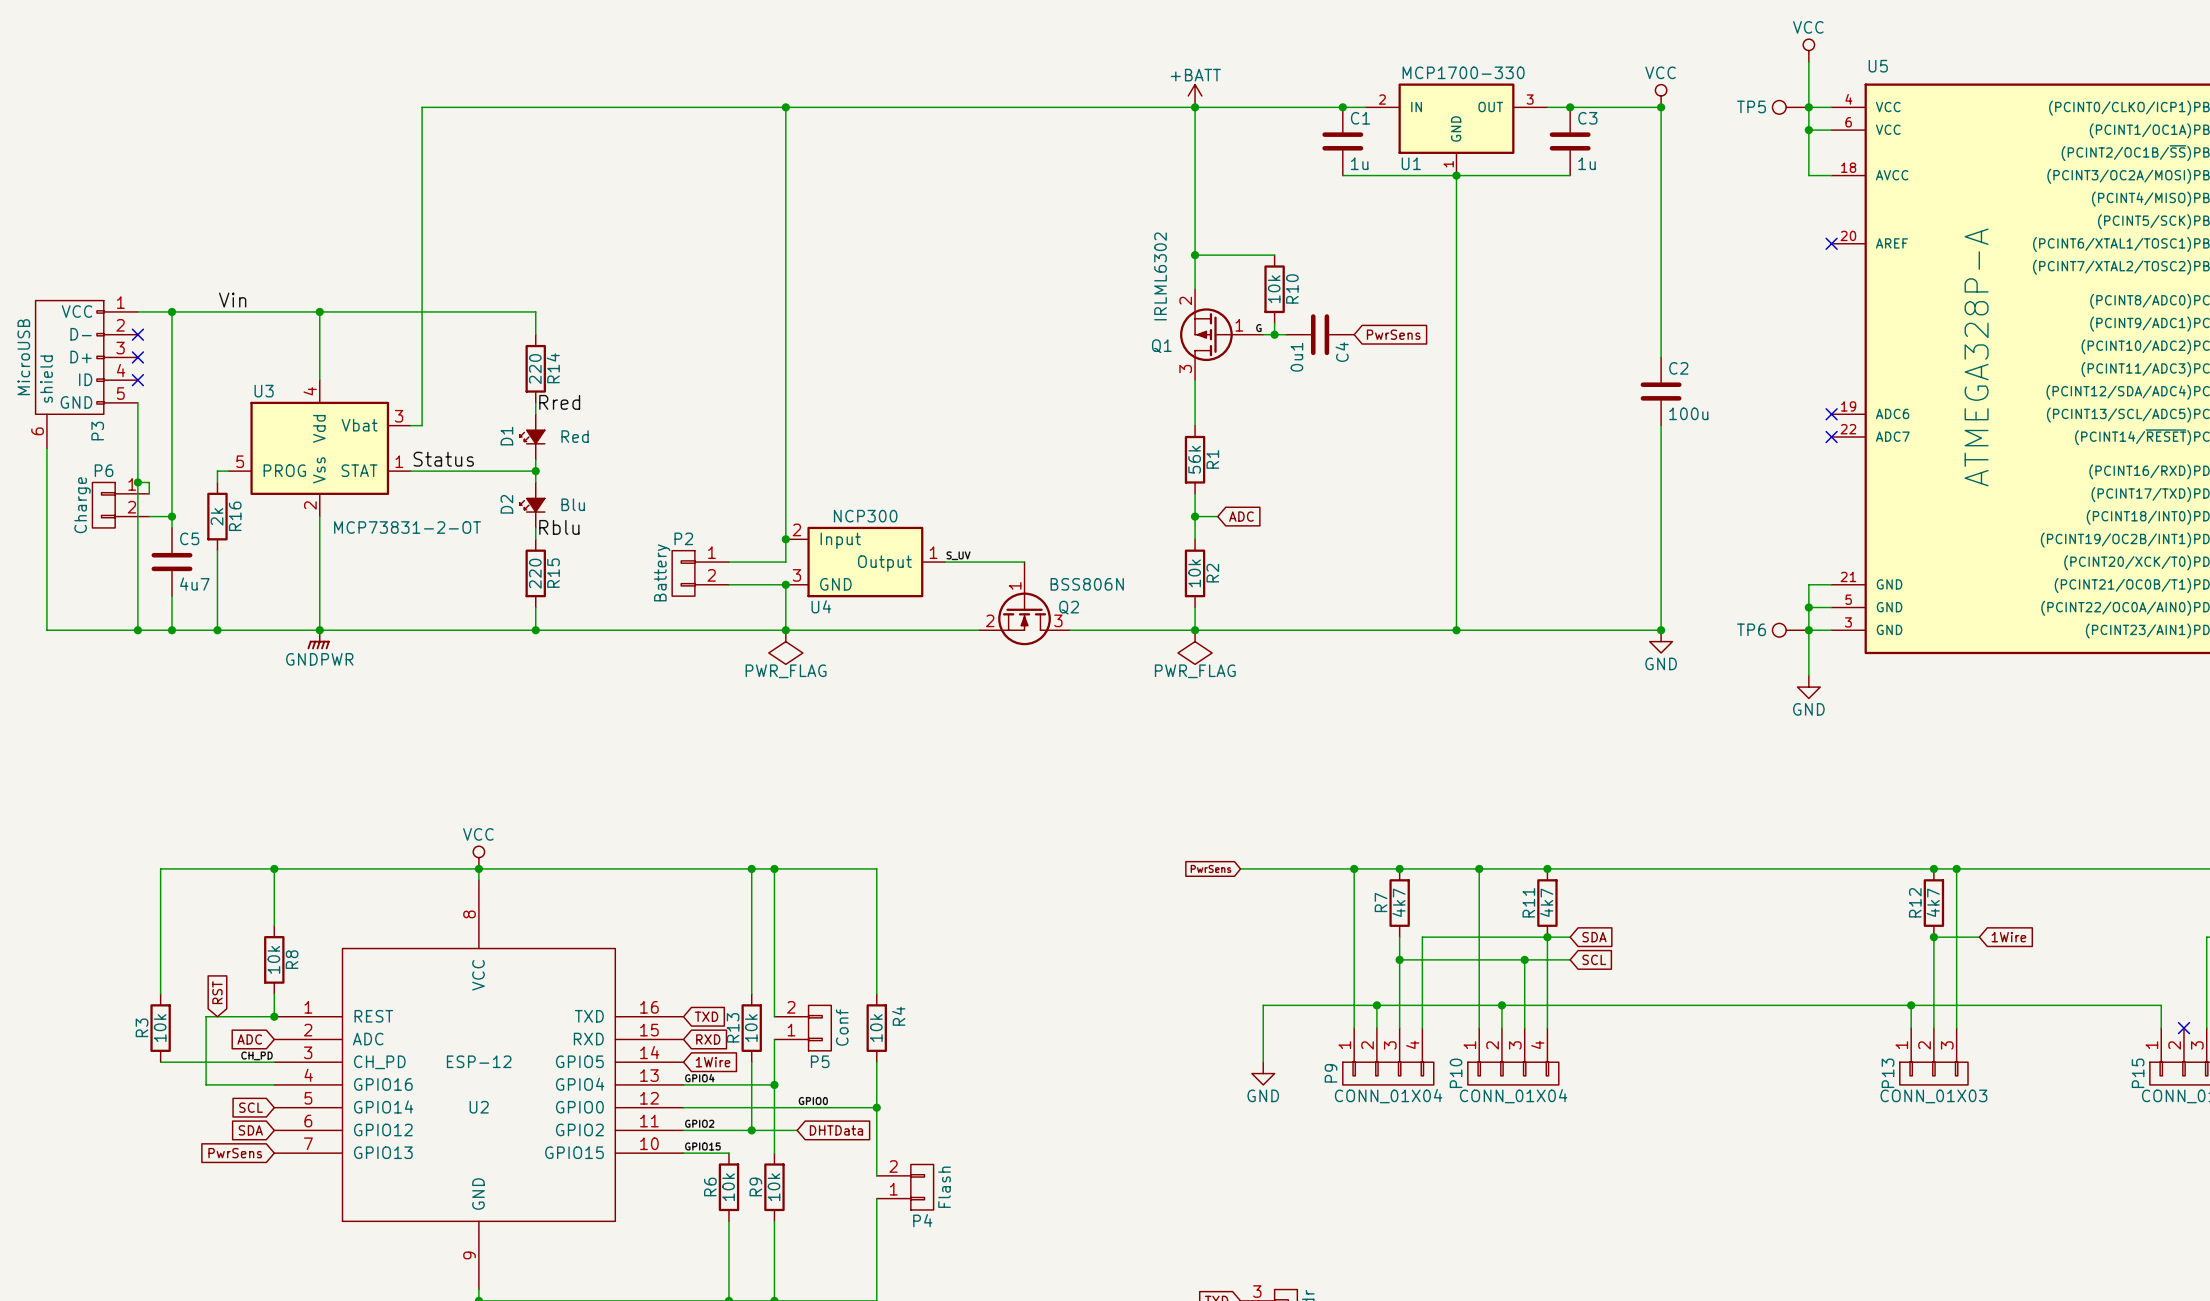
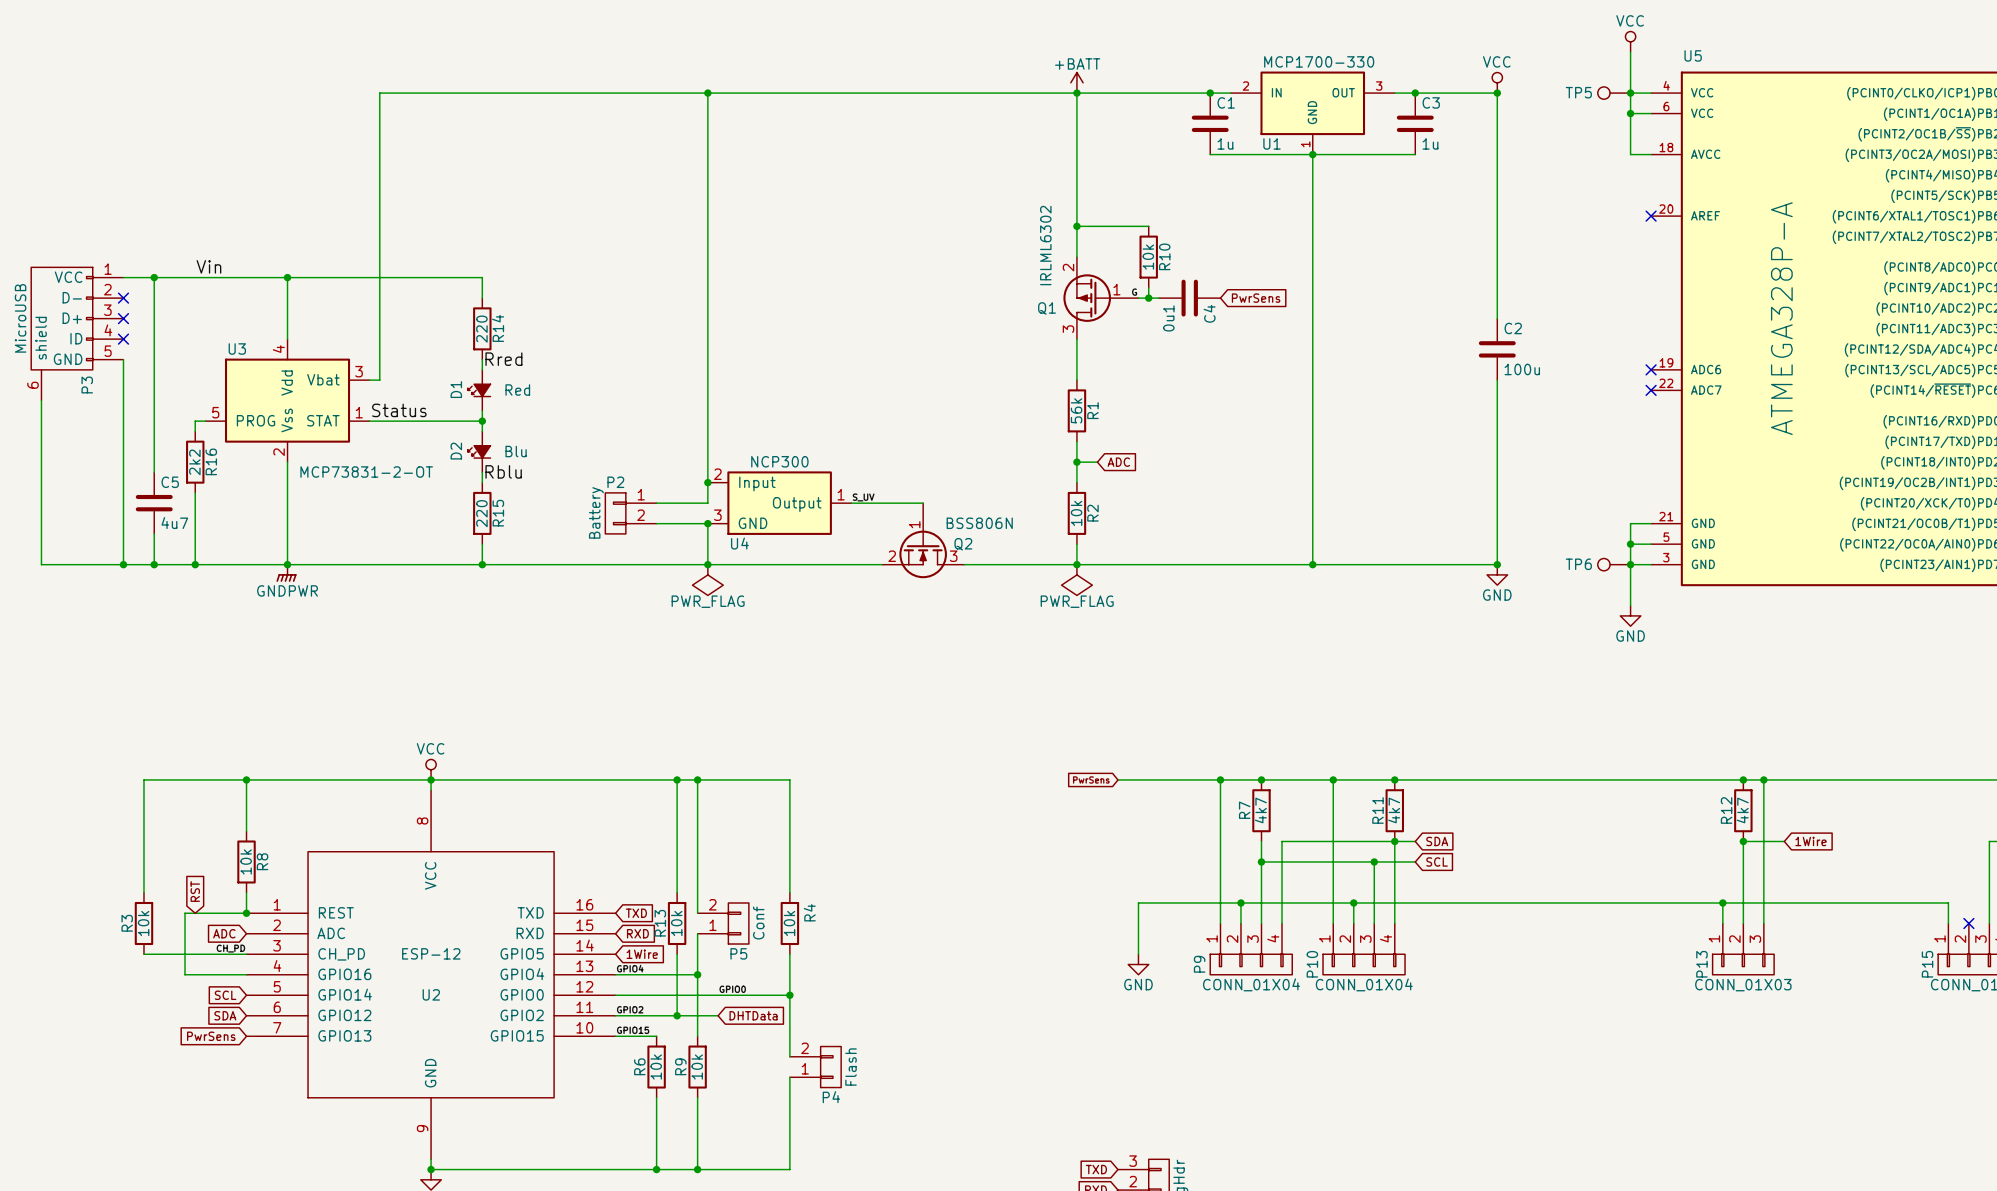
wire: (137, 482) (149, 482) (149, 493) -> none
junction: (137, 482) -> none
P6: Charge (120, 505) -> none
wire: (149, 516) (171, 516) -> none
junction: (171, 516) -> none
R16 value: 2k (217, 516) -> 2k2 (194, 462)

